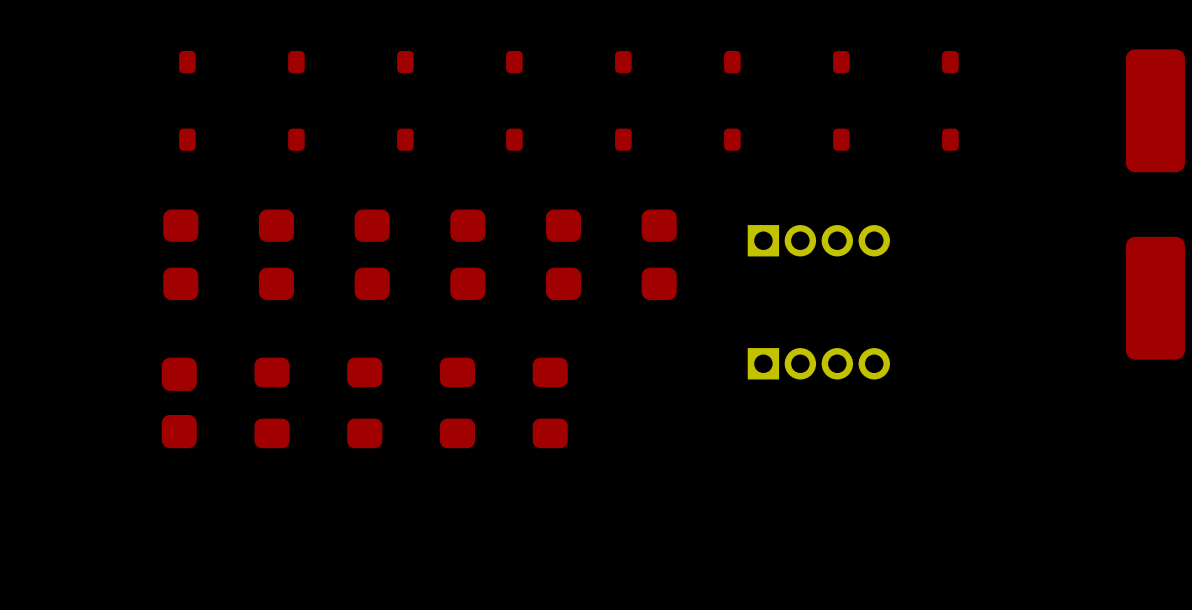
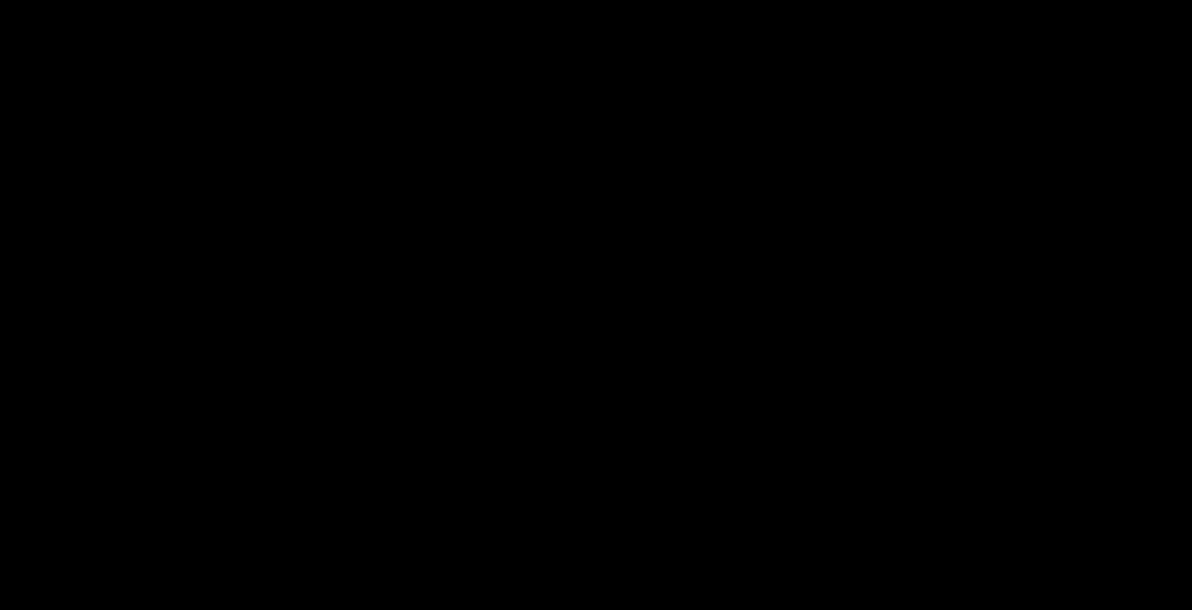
part: (187, 100) -> none
part: (296, 100) -> none
part: (405, 100) -> none
part: (514, 100) -> none
part: (623, 100) -> none
part: (732, 100) -> none
part: (841, 100) -> none
part: (950, 100) -> none
part: (1155, 204) -> none
part: (818, 240) -> none
part: (180, 254) -> none
part: (276, 254) -> none
part: (372, 254) -> none
part: (467, 254) -> none
part: (563, 254) -> none
part: (659, 254) -> none
part: (818, 363) -> none
part: (179, 402) -> none
part: (272, 402) -> none
part: (364, 402) -> none
part: (457, 402) -> none
part: (550, 402) -> none

